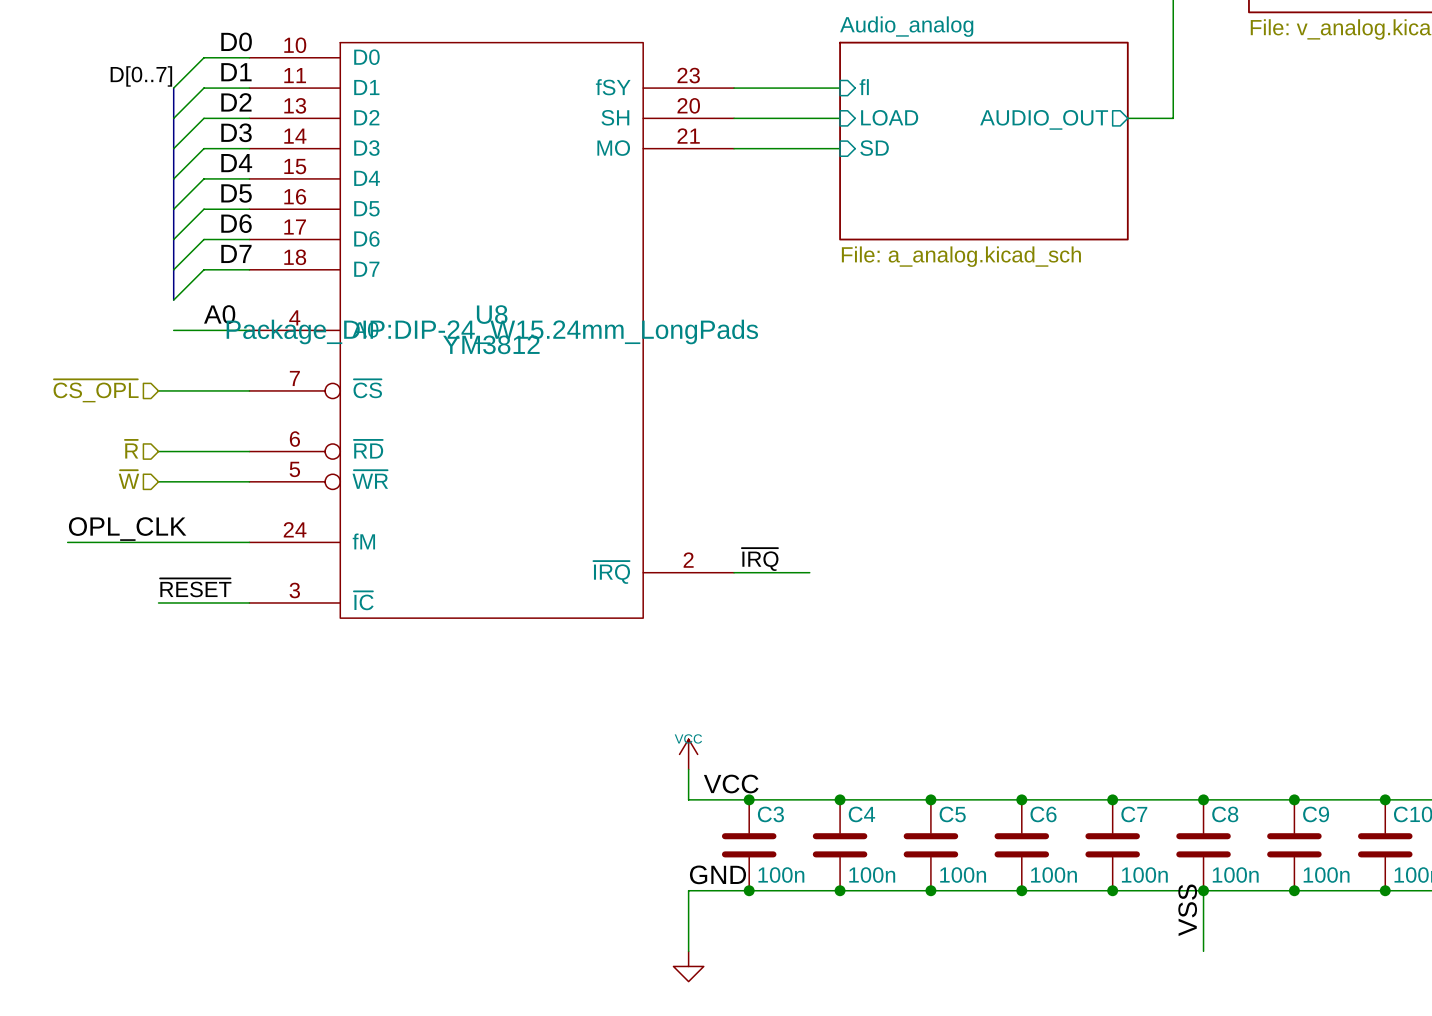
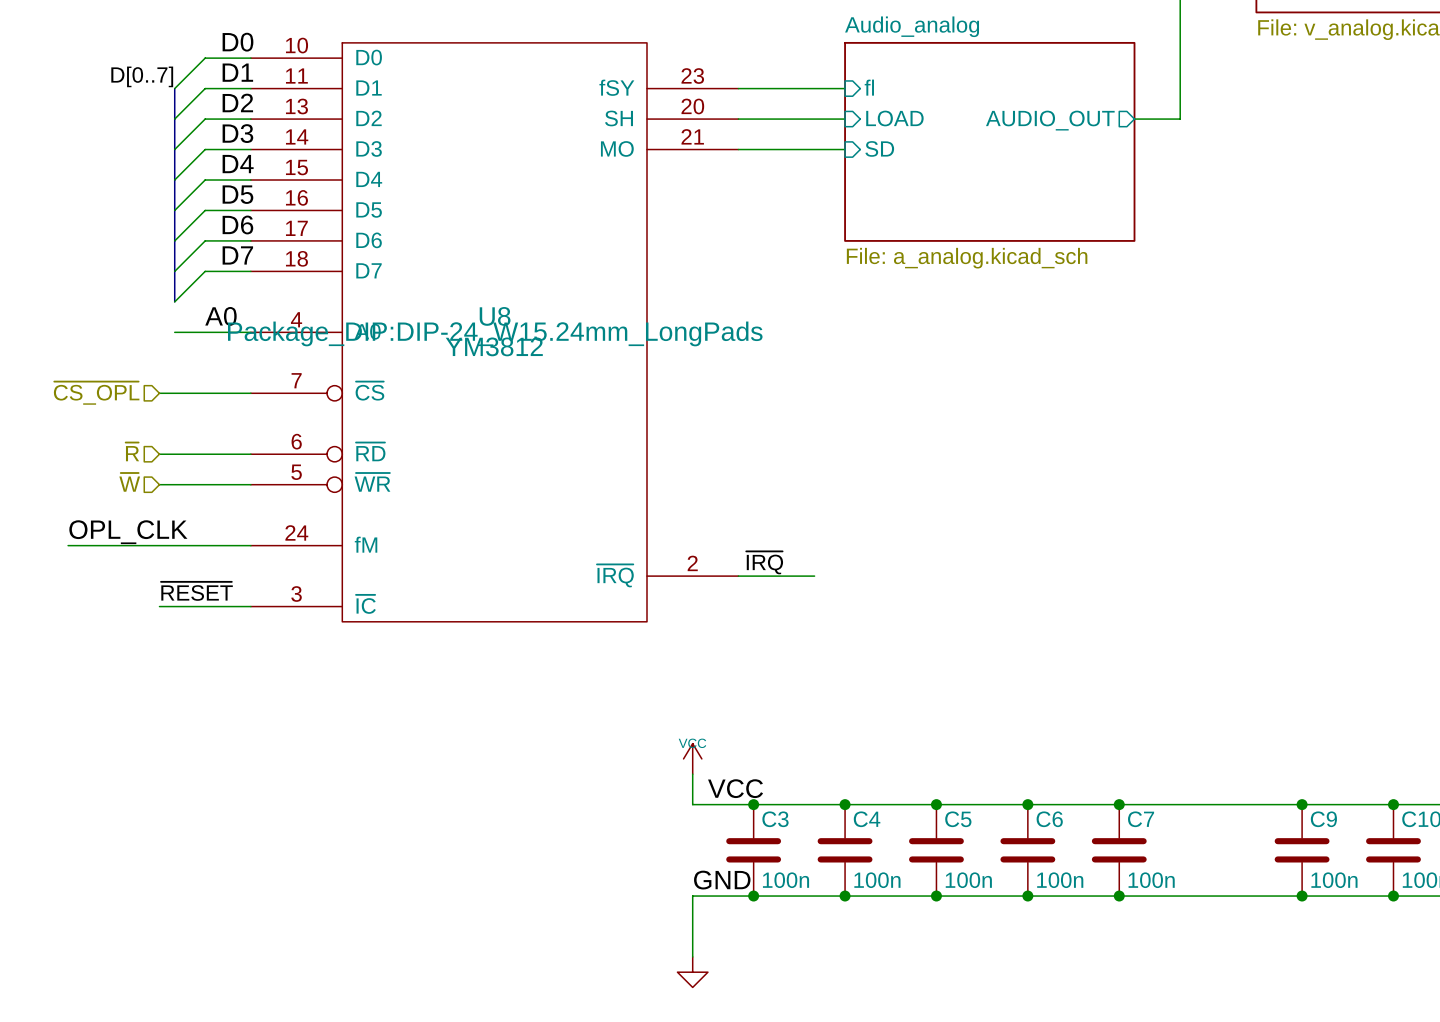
junction: (1203, 799) -> none
C8: 100n (1203, 845) -> none
wire: (1203, 890) (1203, 951) -> none
junction: (1203, 890) -> none
label: VSS (1187, 910) -> none

